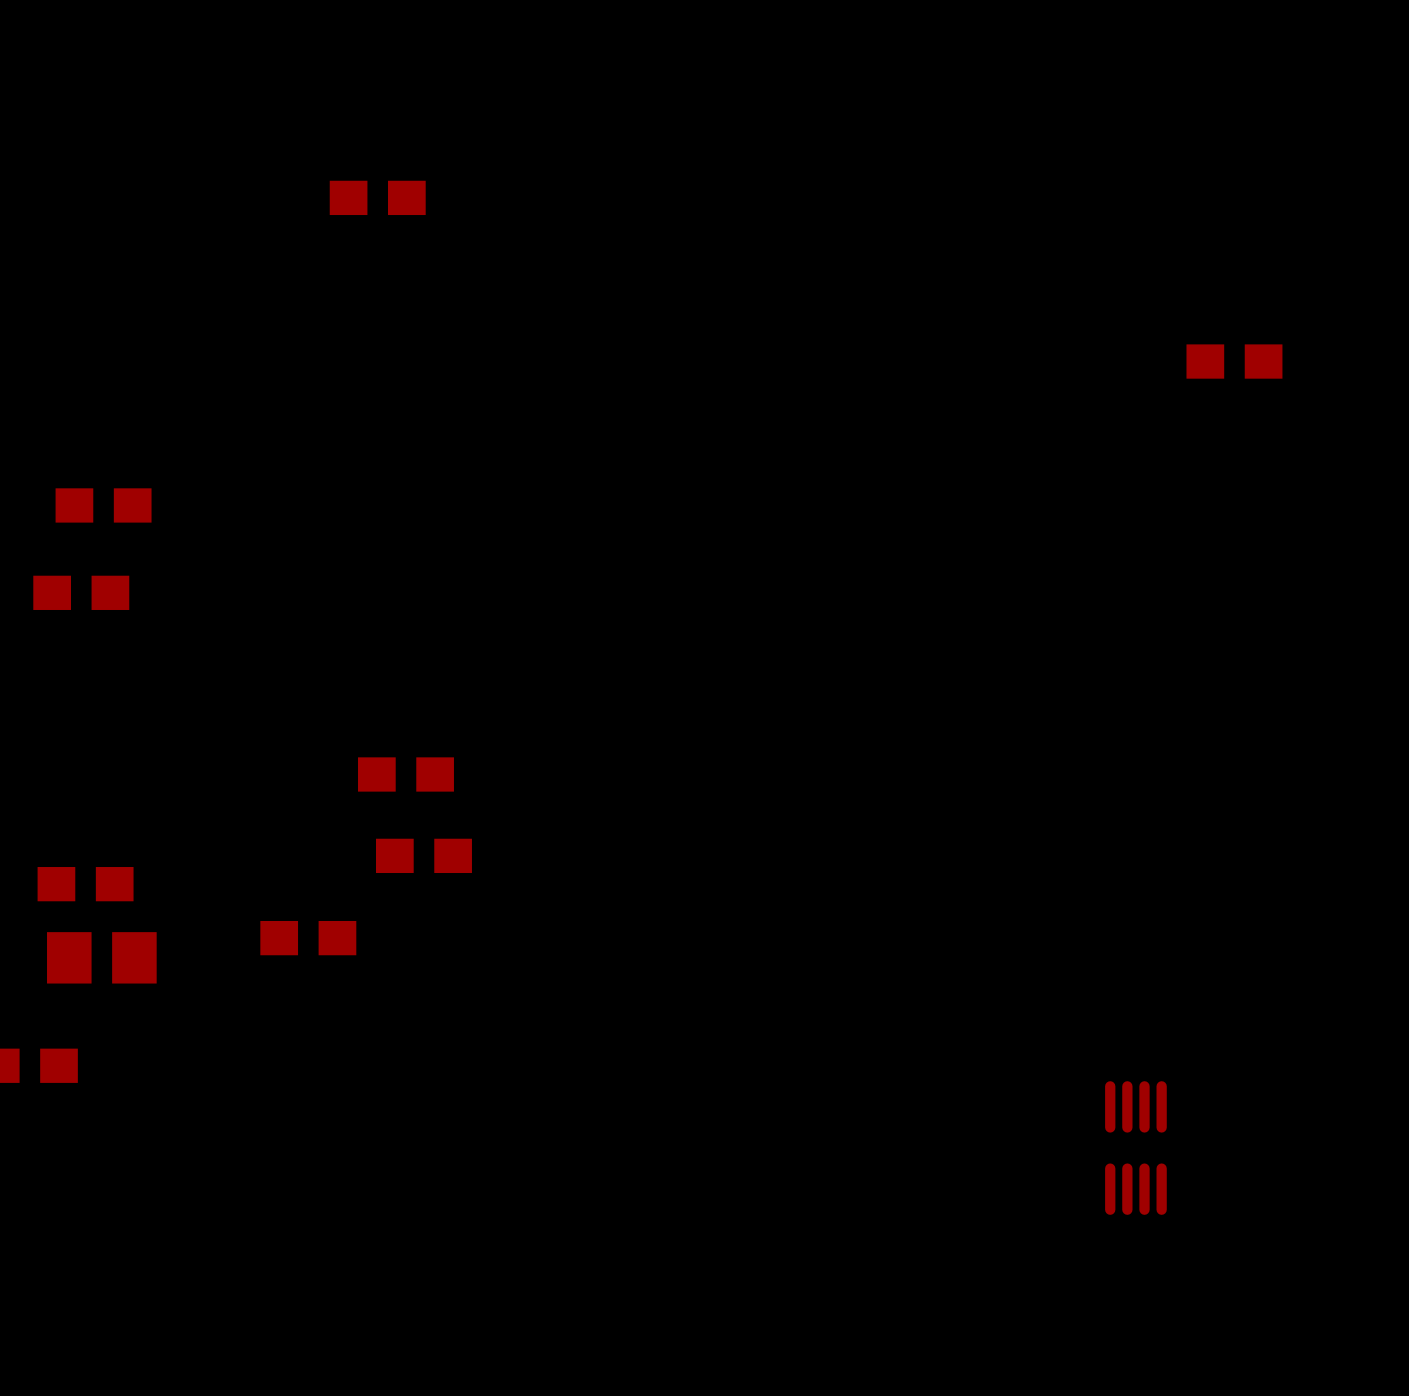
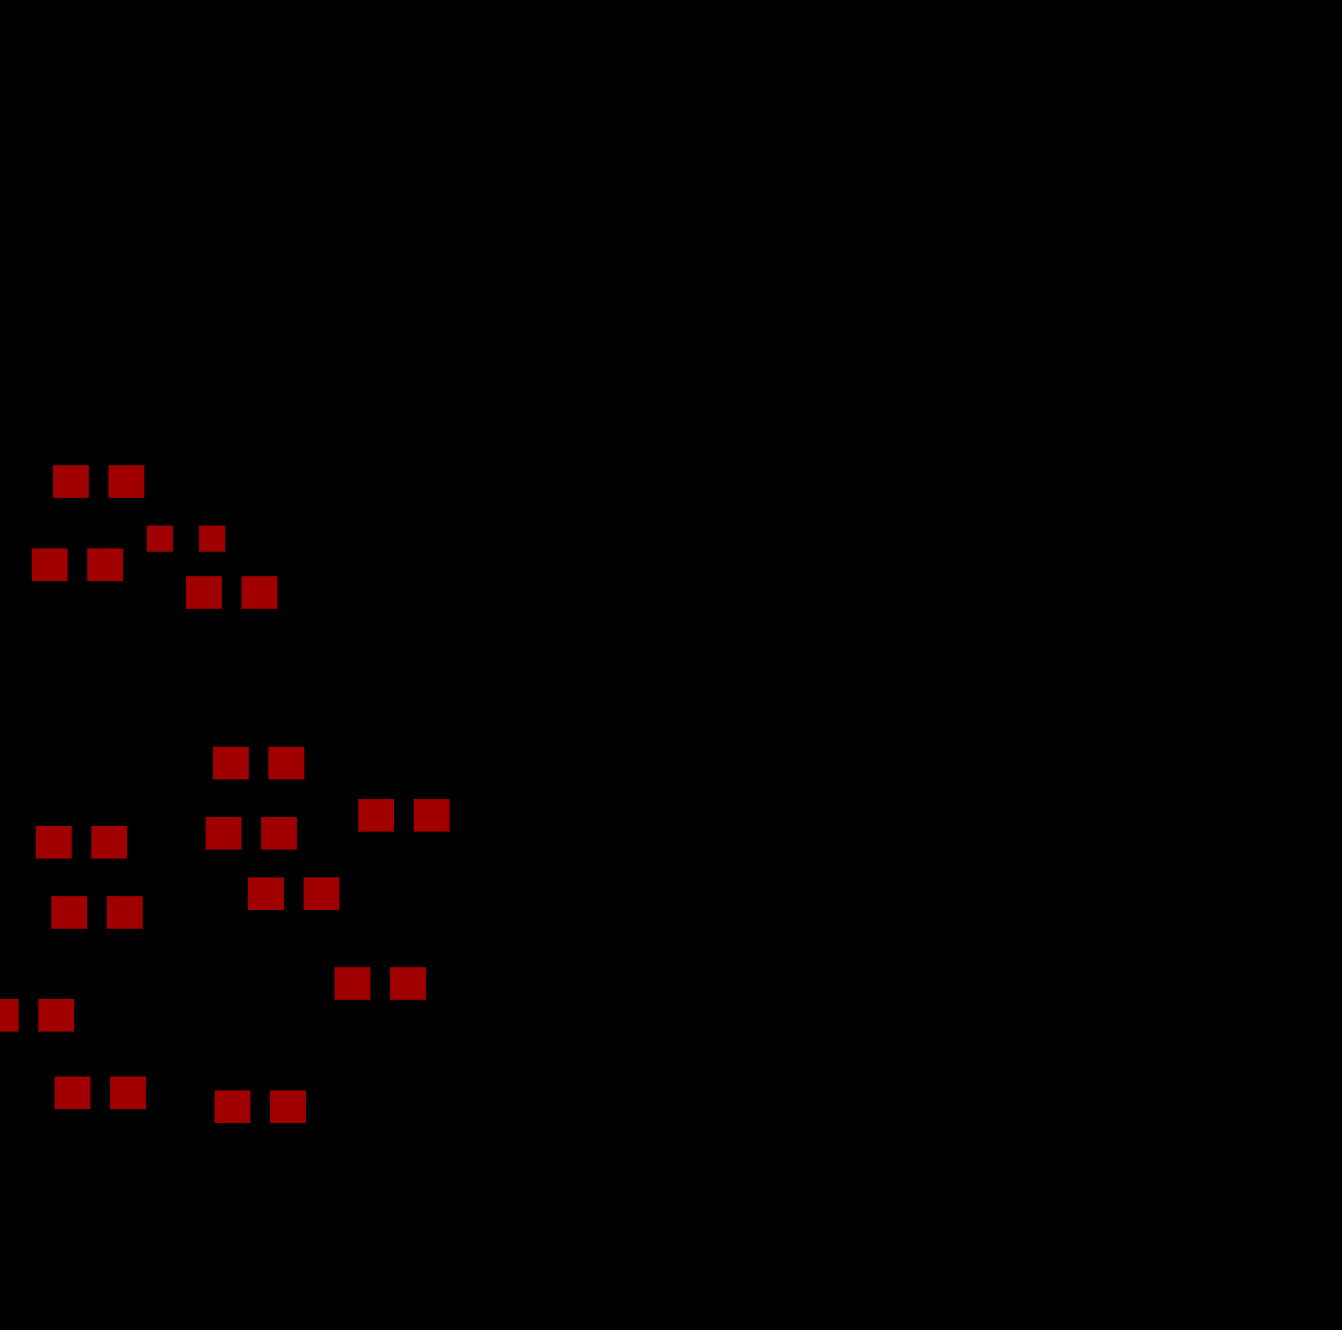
part: (377, 197) -> none
part: (1234, 361) -> none
part: none -> (185, 538)
part: none -> (231, 592)
part: (405, 774) -> none
part: none -> (258, 763)
part: none -> (251, 833)
part footprint: [47, 932, 157, 984] -> [51, 896, 143, 929]
part: none -> (380, 983)
part: none -> (100, 1092)
part: (1135, 1148) -> none
part: none -> (260, 1106)

